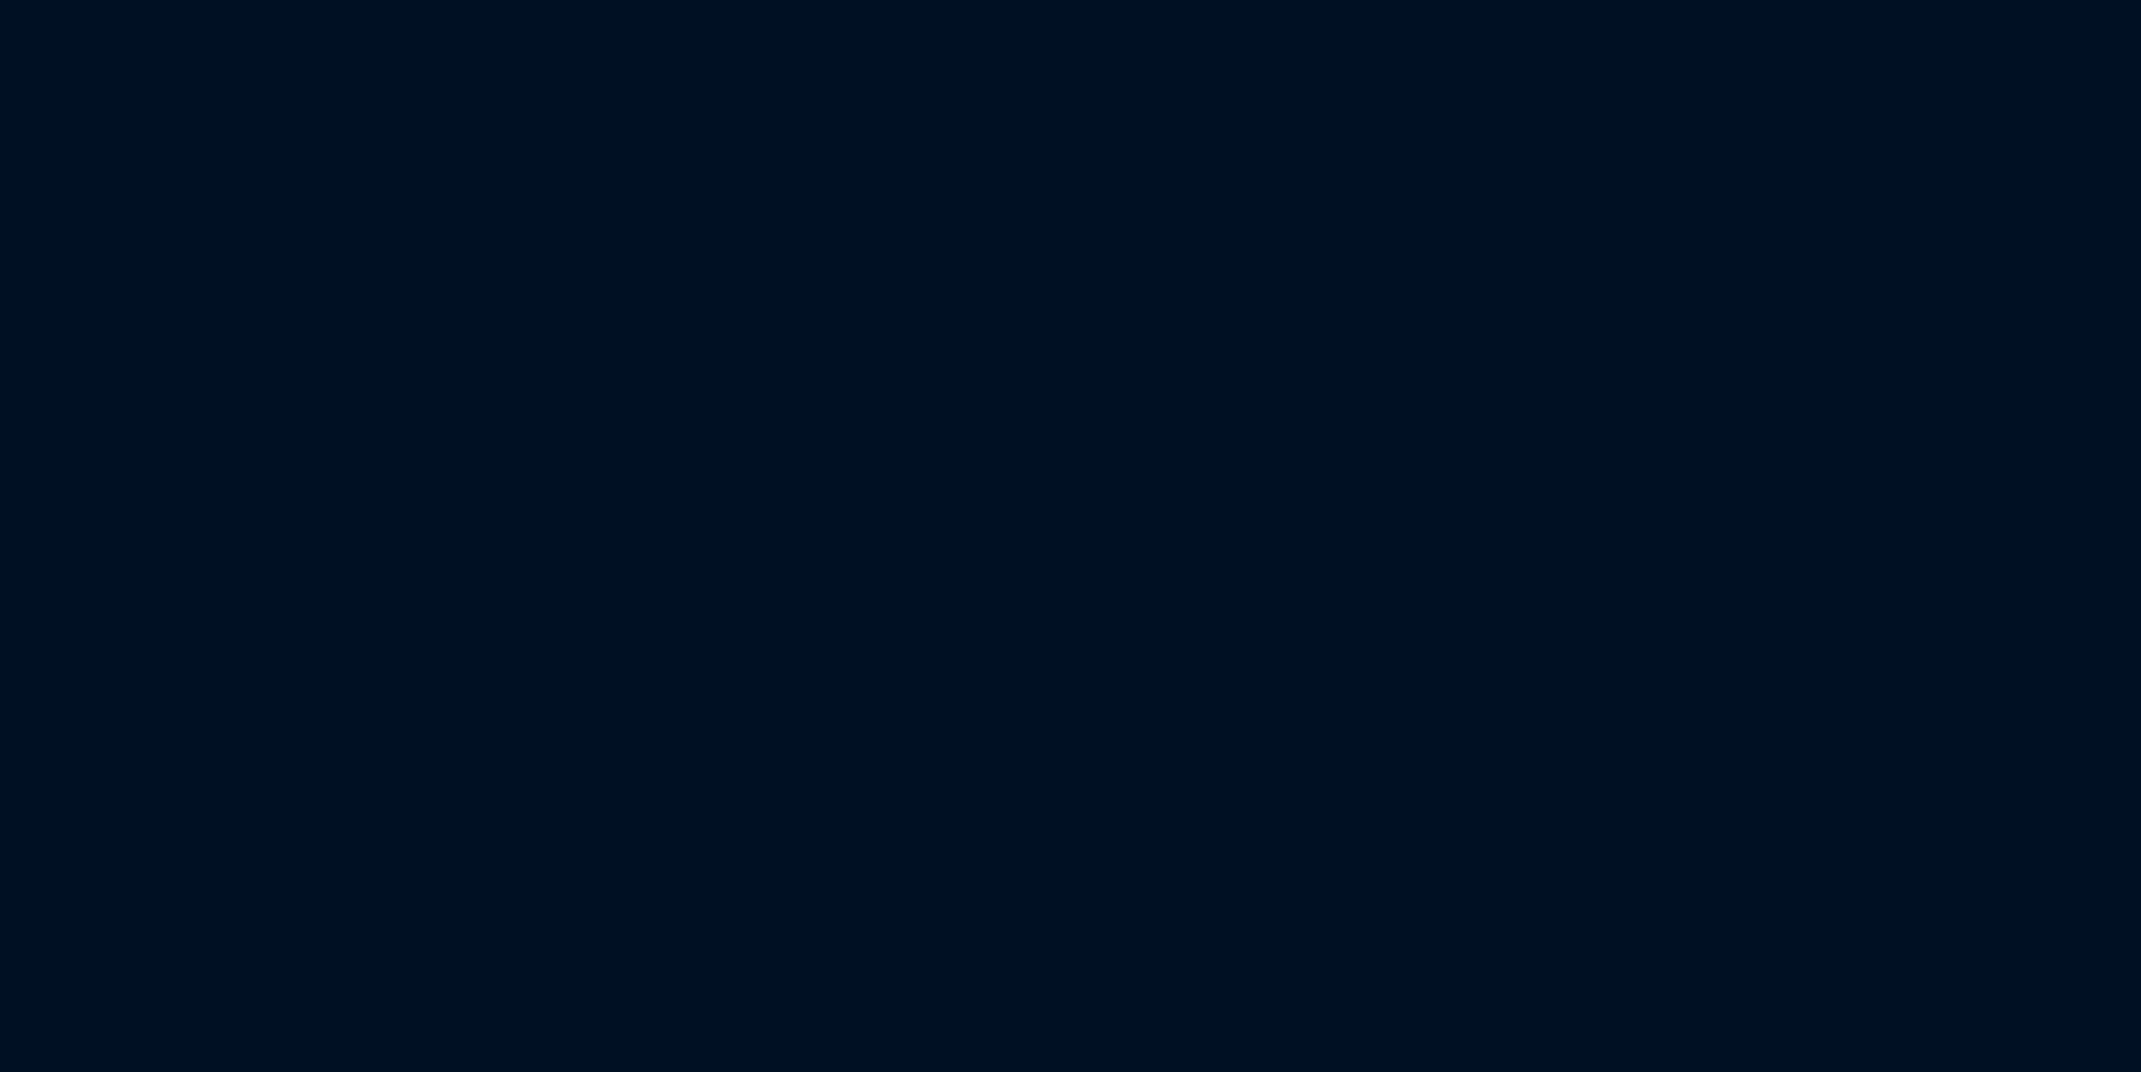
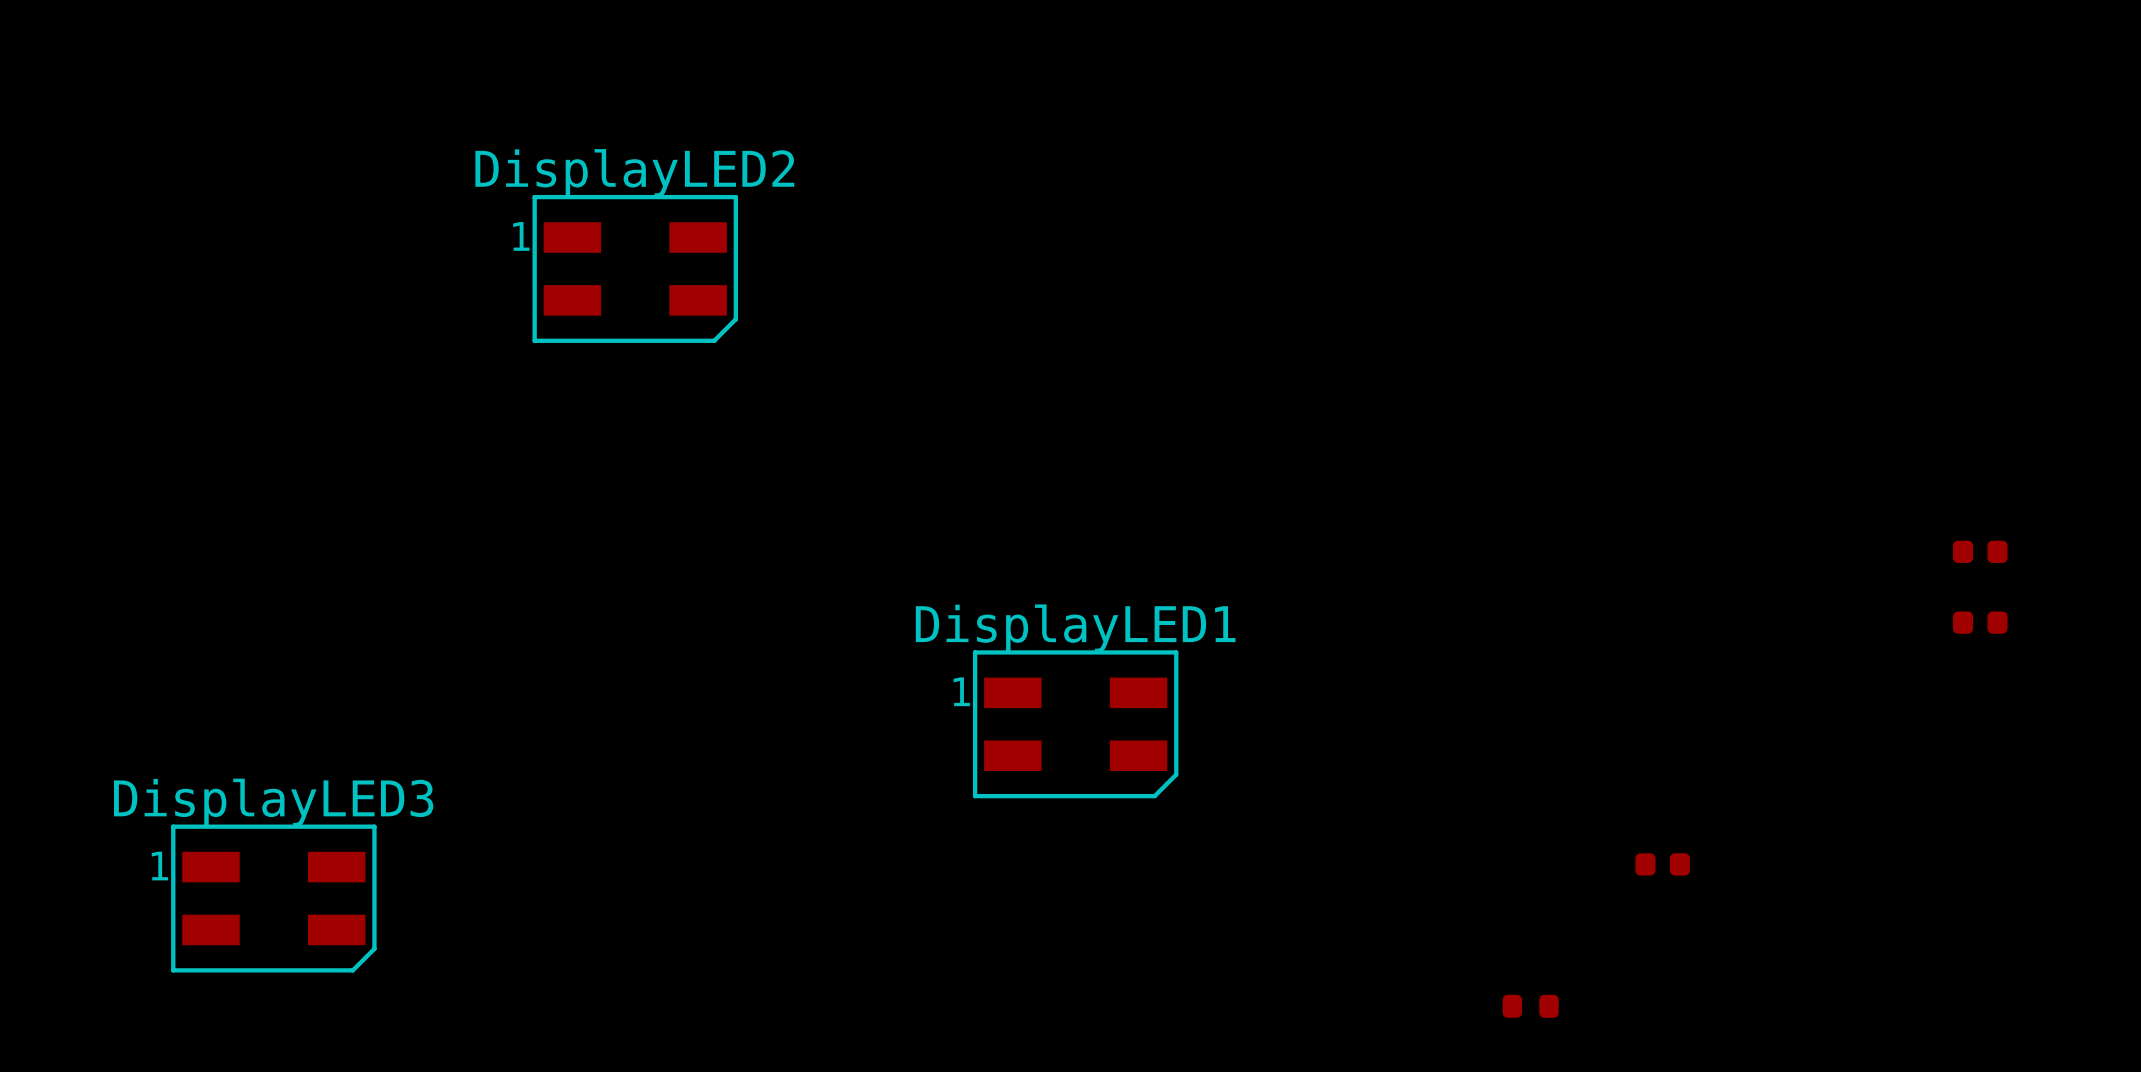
DisplayLED2: none -> (635, 268)
part: none -> (1980, 551)
part: none -> (1980, 622)
DisplayLED1: none -> (1075, 724)
part: none -> (1662, 864)
DisplayLED3: none -> (273, 898)
part: none -> (1530, 1006)

